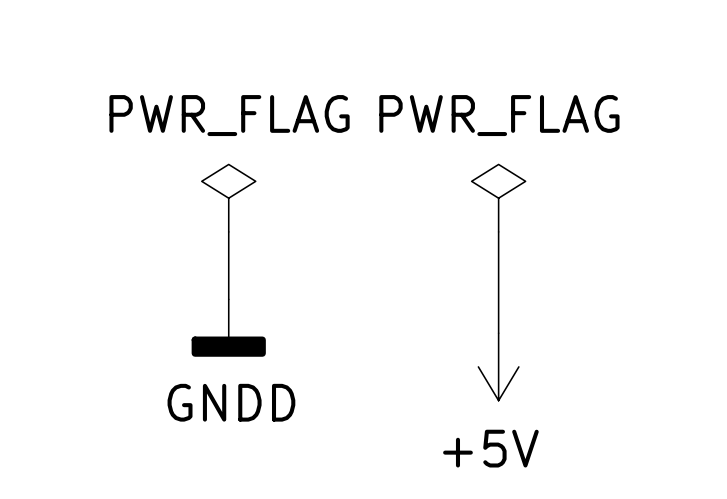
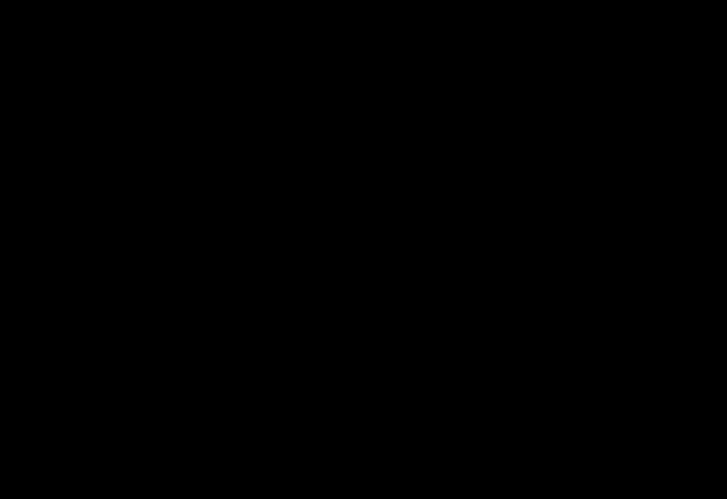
power symbol: PWR_FLAG (228, 198) -> none
power symbol: PWR_FLAG (498, 198) -> none
wire: (228, 231) (228, 299) -> none
wire: (498, 231) (498, 333) -> none
power symbol: GNDD (228, 328) -> none
power symbol: +5V (498, 366) -> none

